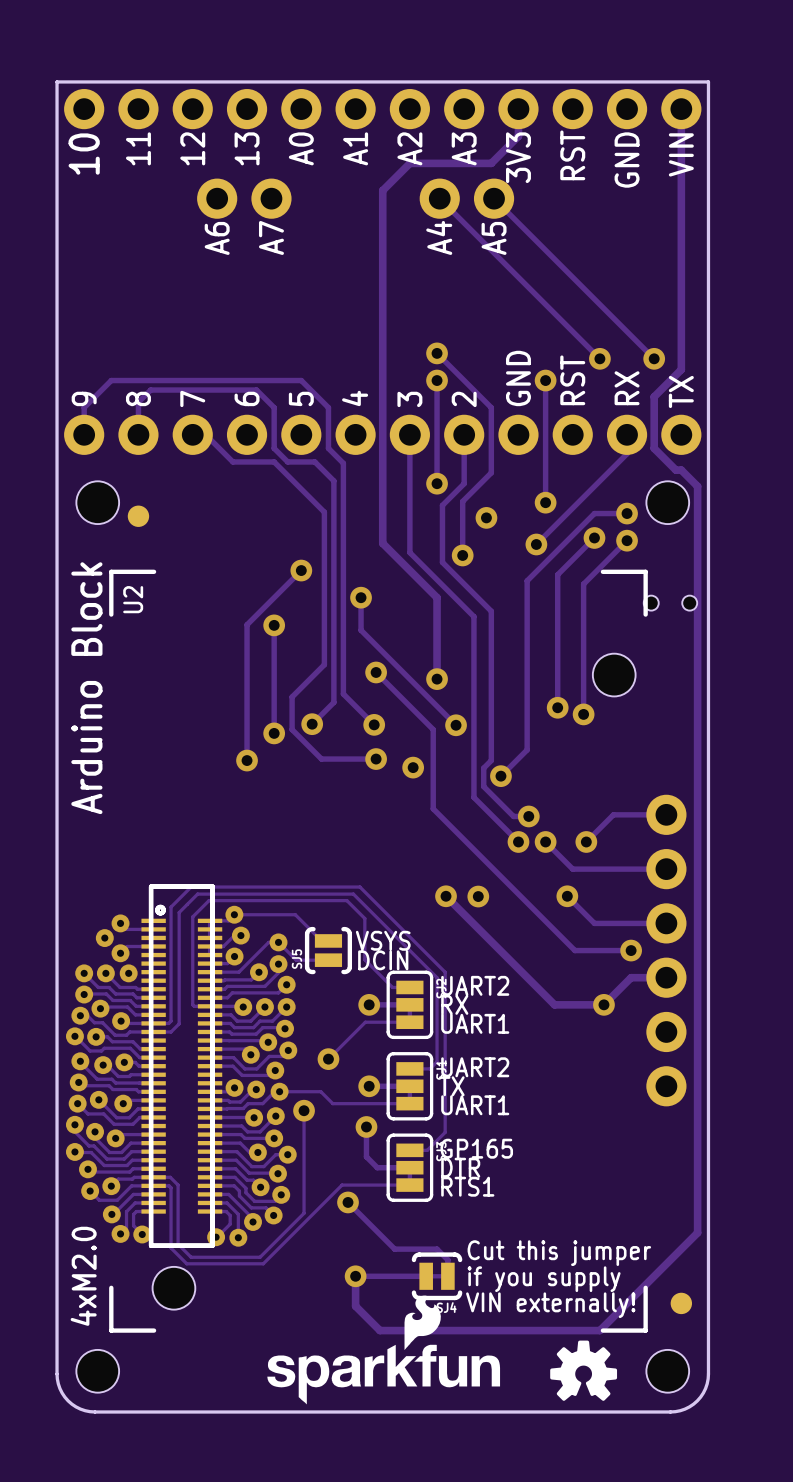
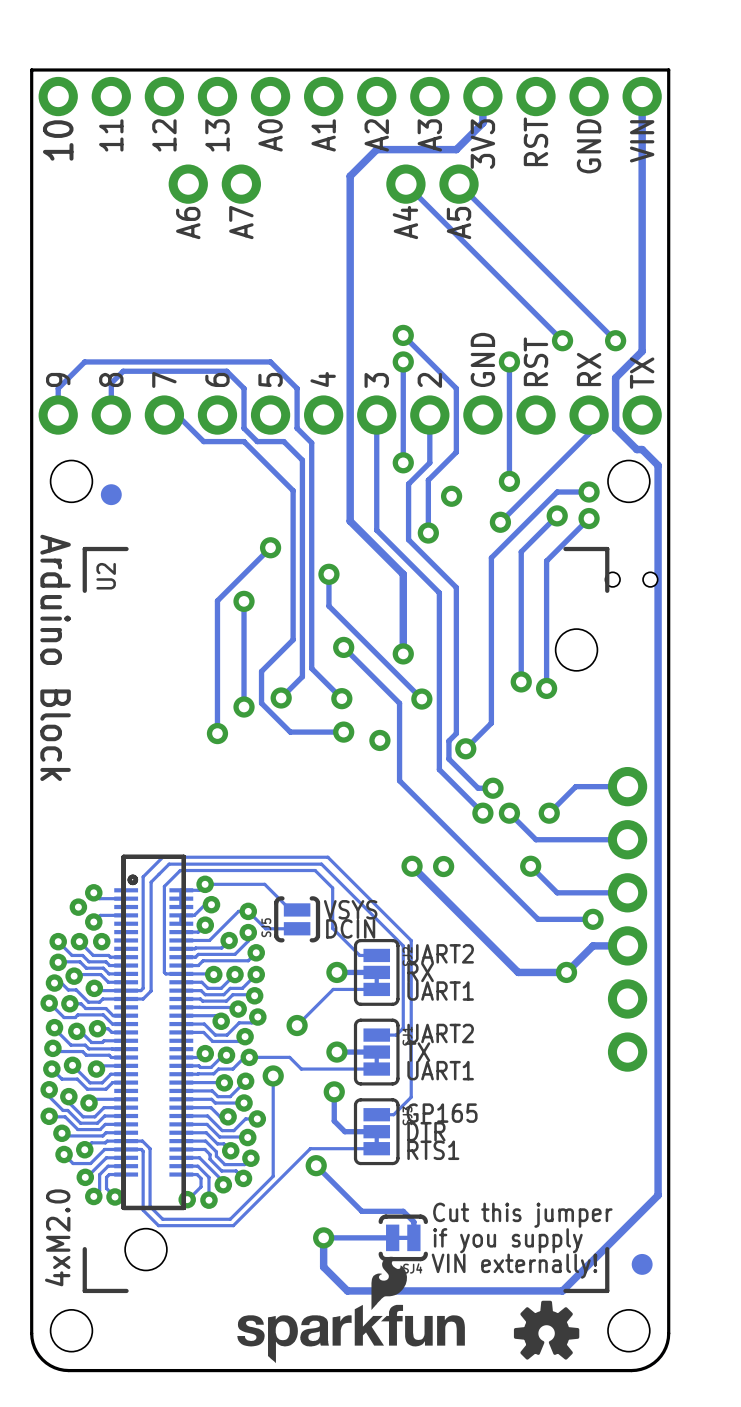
text rotation: 0° (86, 688) -> 180° (55, 657)

